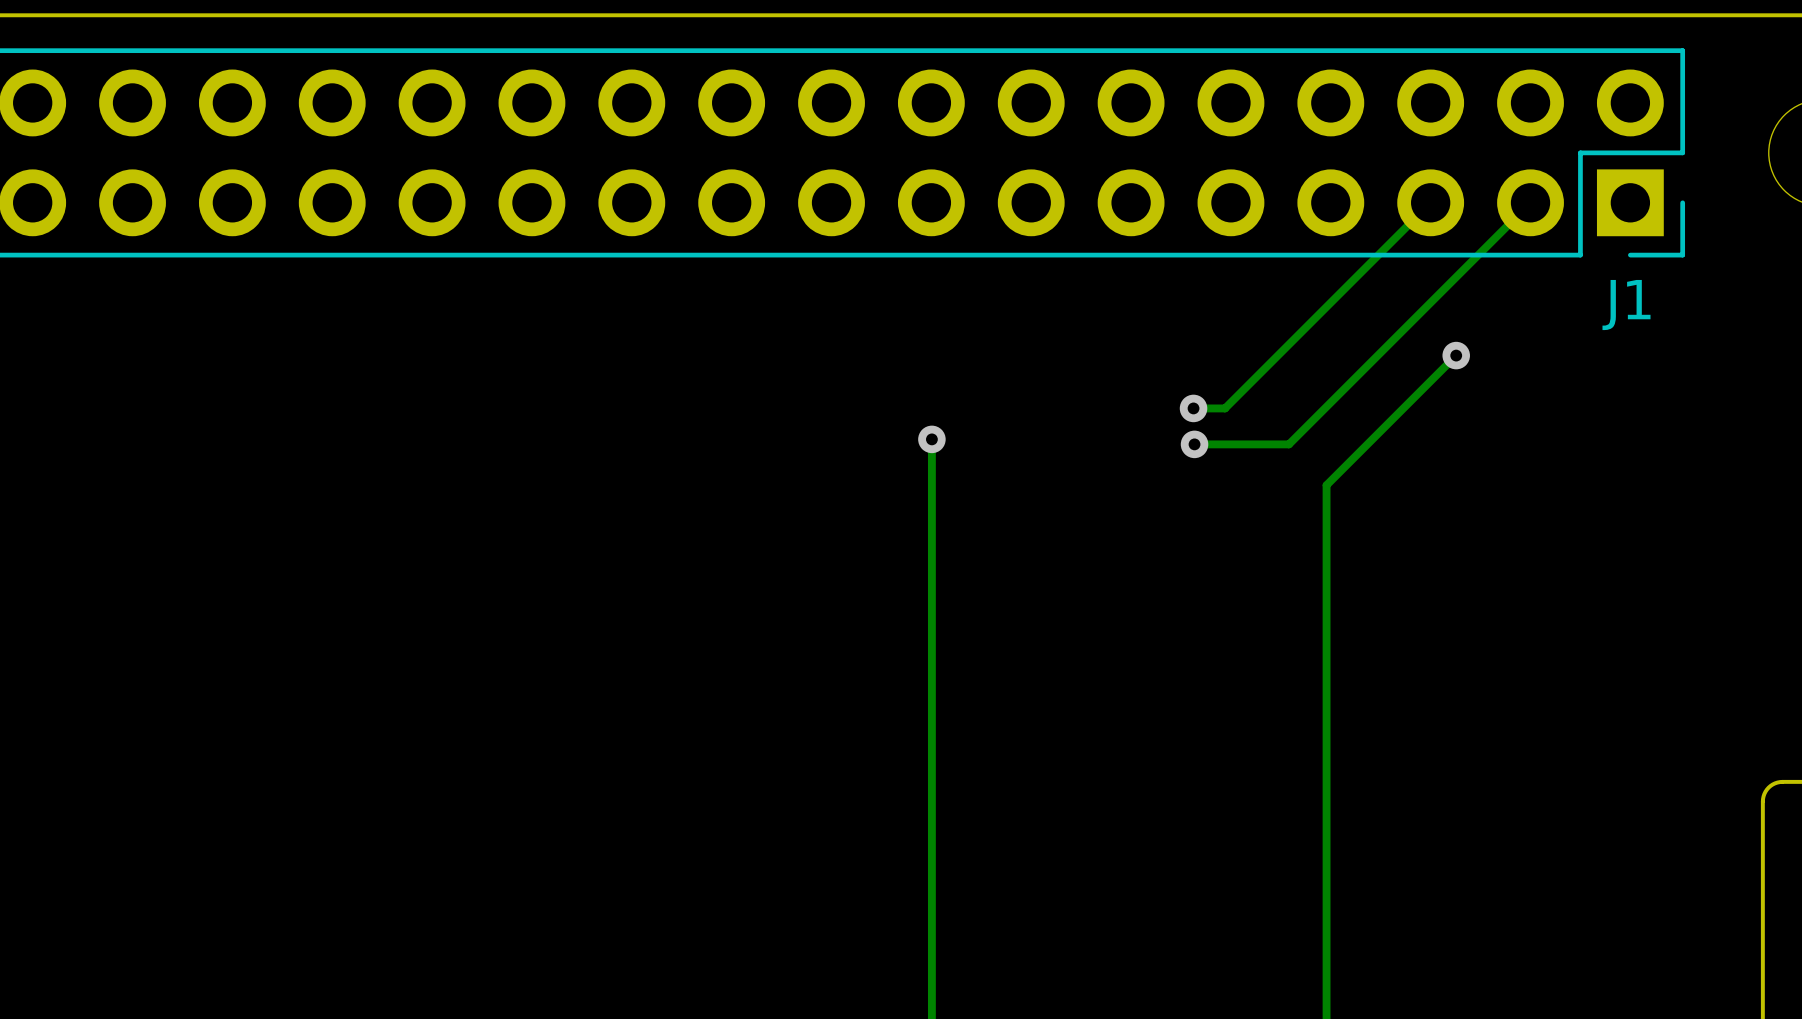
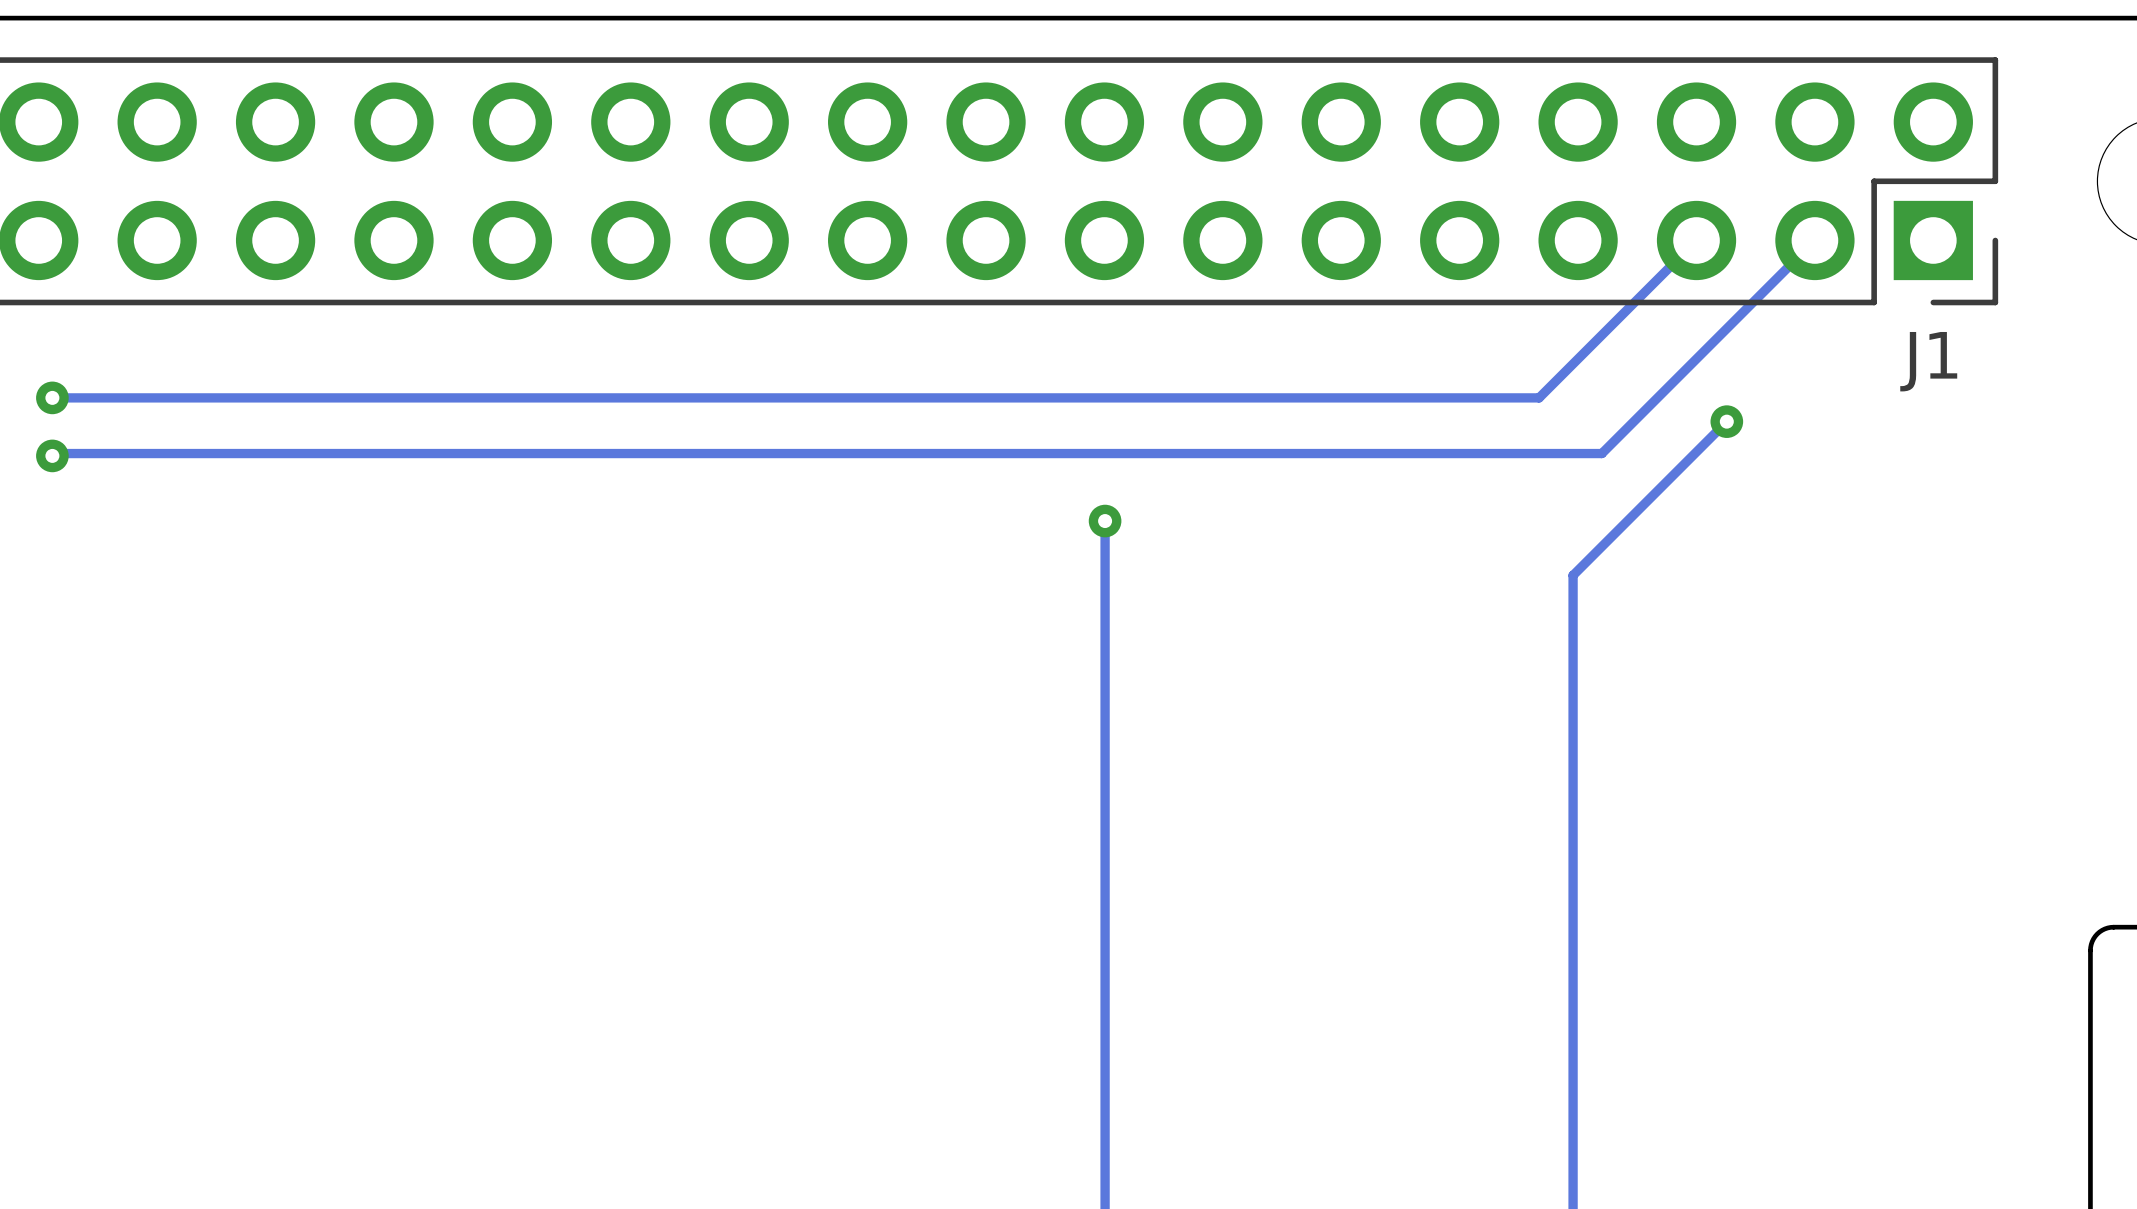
via: none -> (52, 397)
track: (1297, 335) (1225, 408) (1193, 408) -> (1539, 397) (52, 397)
track: (1350, 382) (1288, 444) (1194, 444) -> (1601, 453) (54, 453) (52, 455)
via: none -> (52, 455)
via: (1193, 408) -> none
via: (1194, 444) -> none

